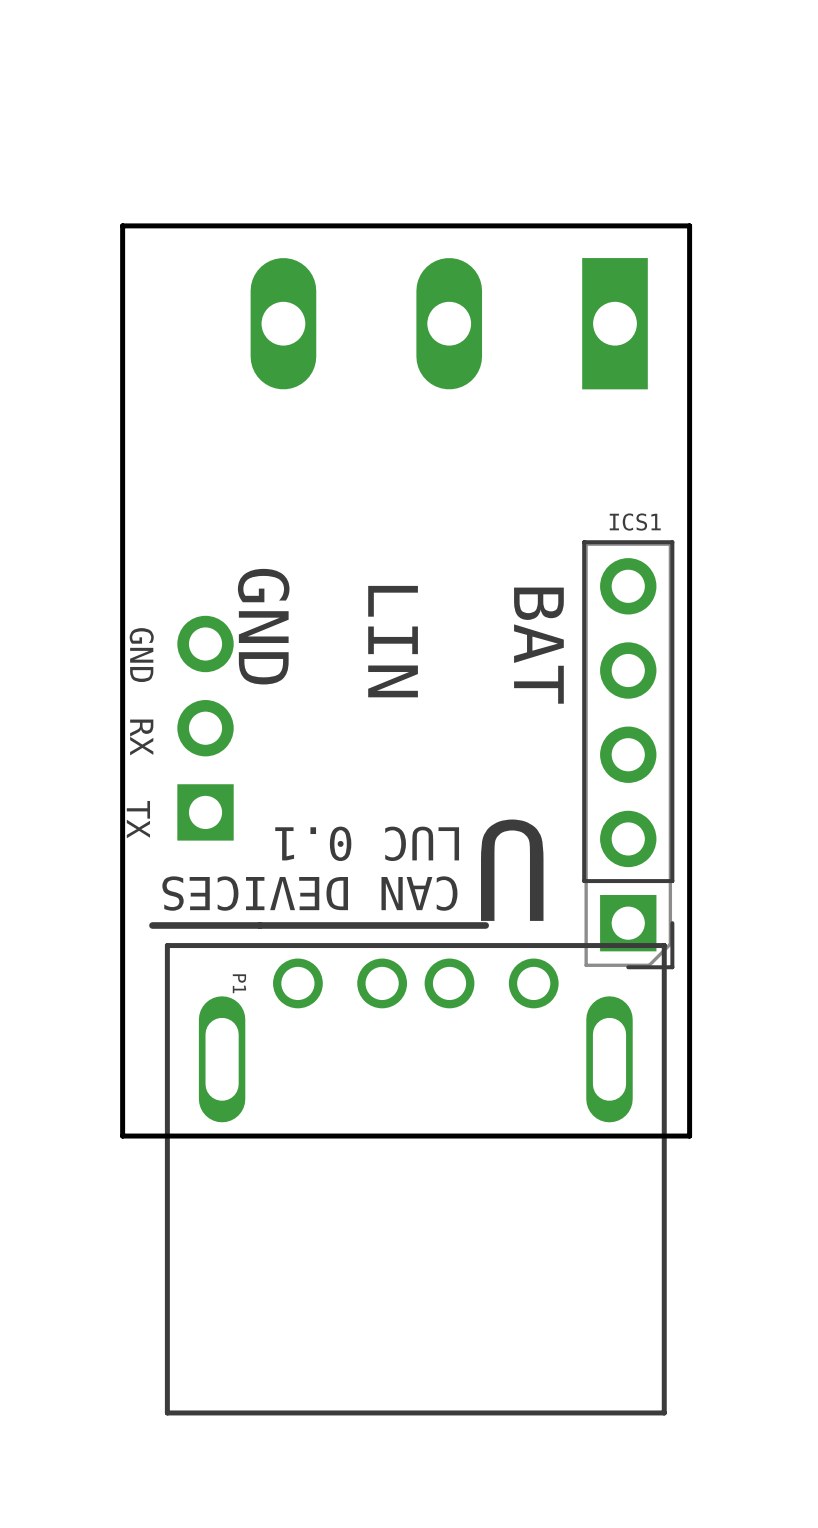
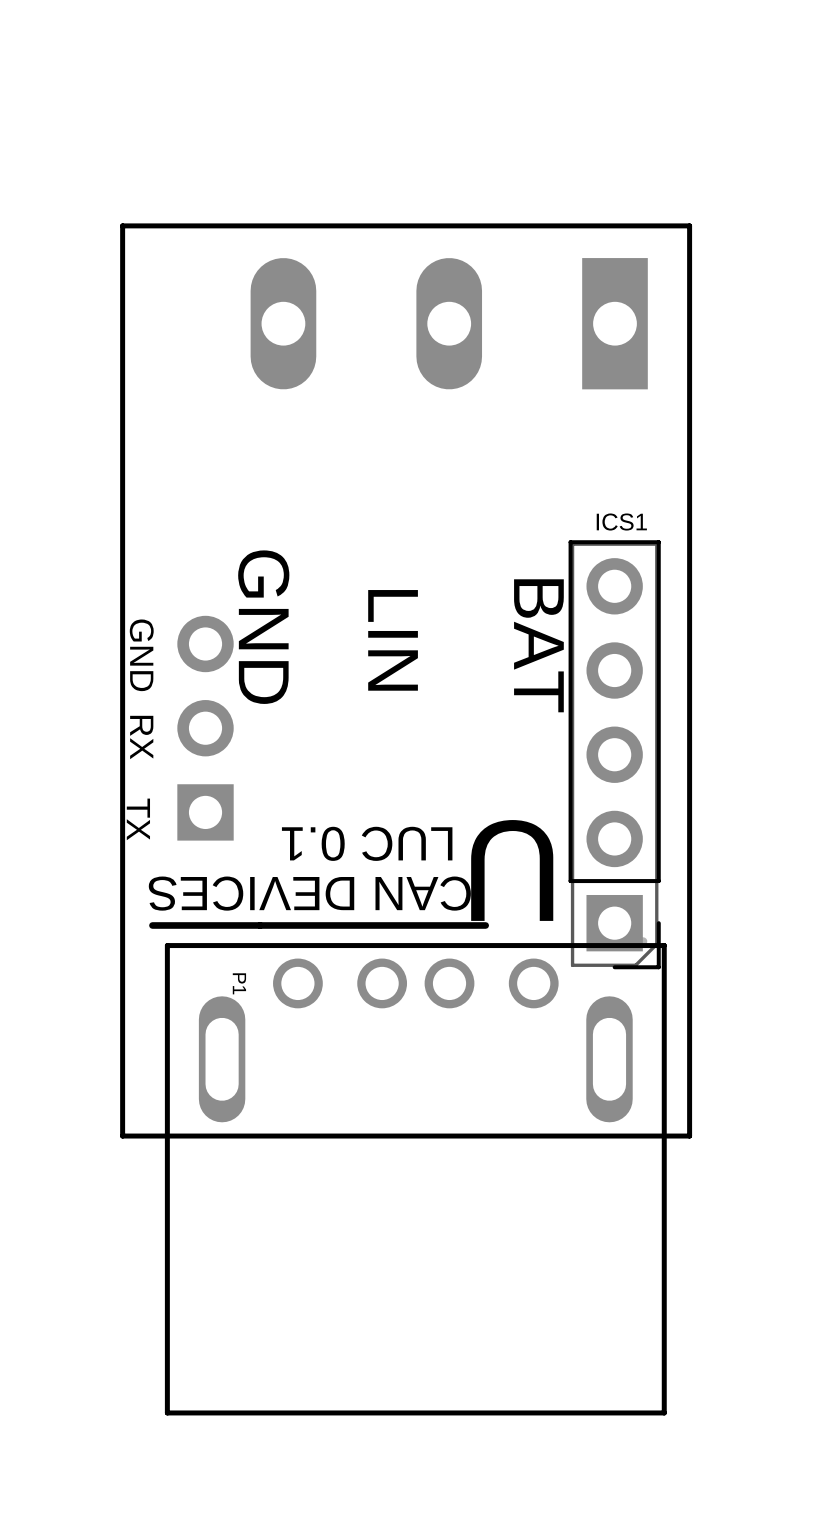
ICS1 position: (628, 754) -> (614, 754)

